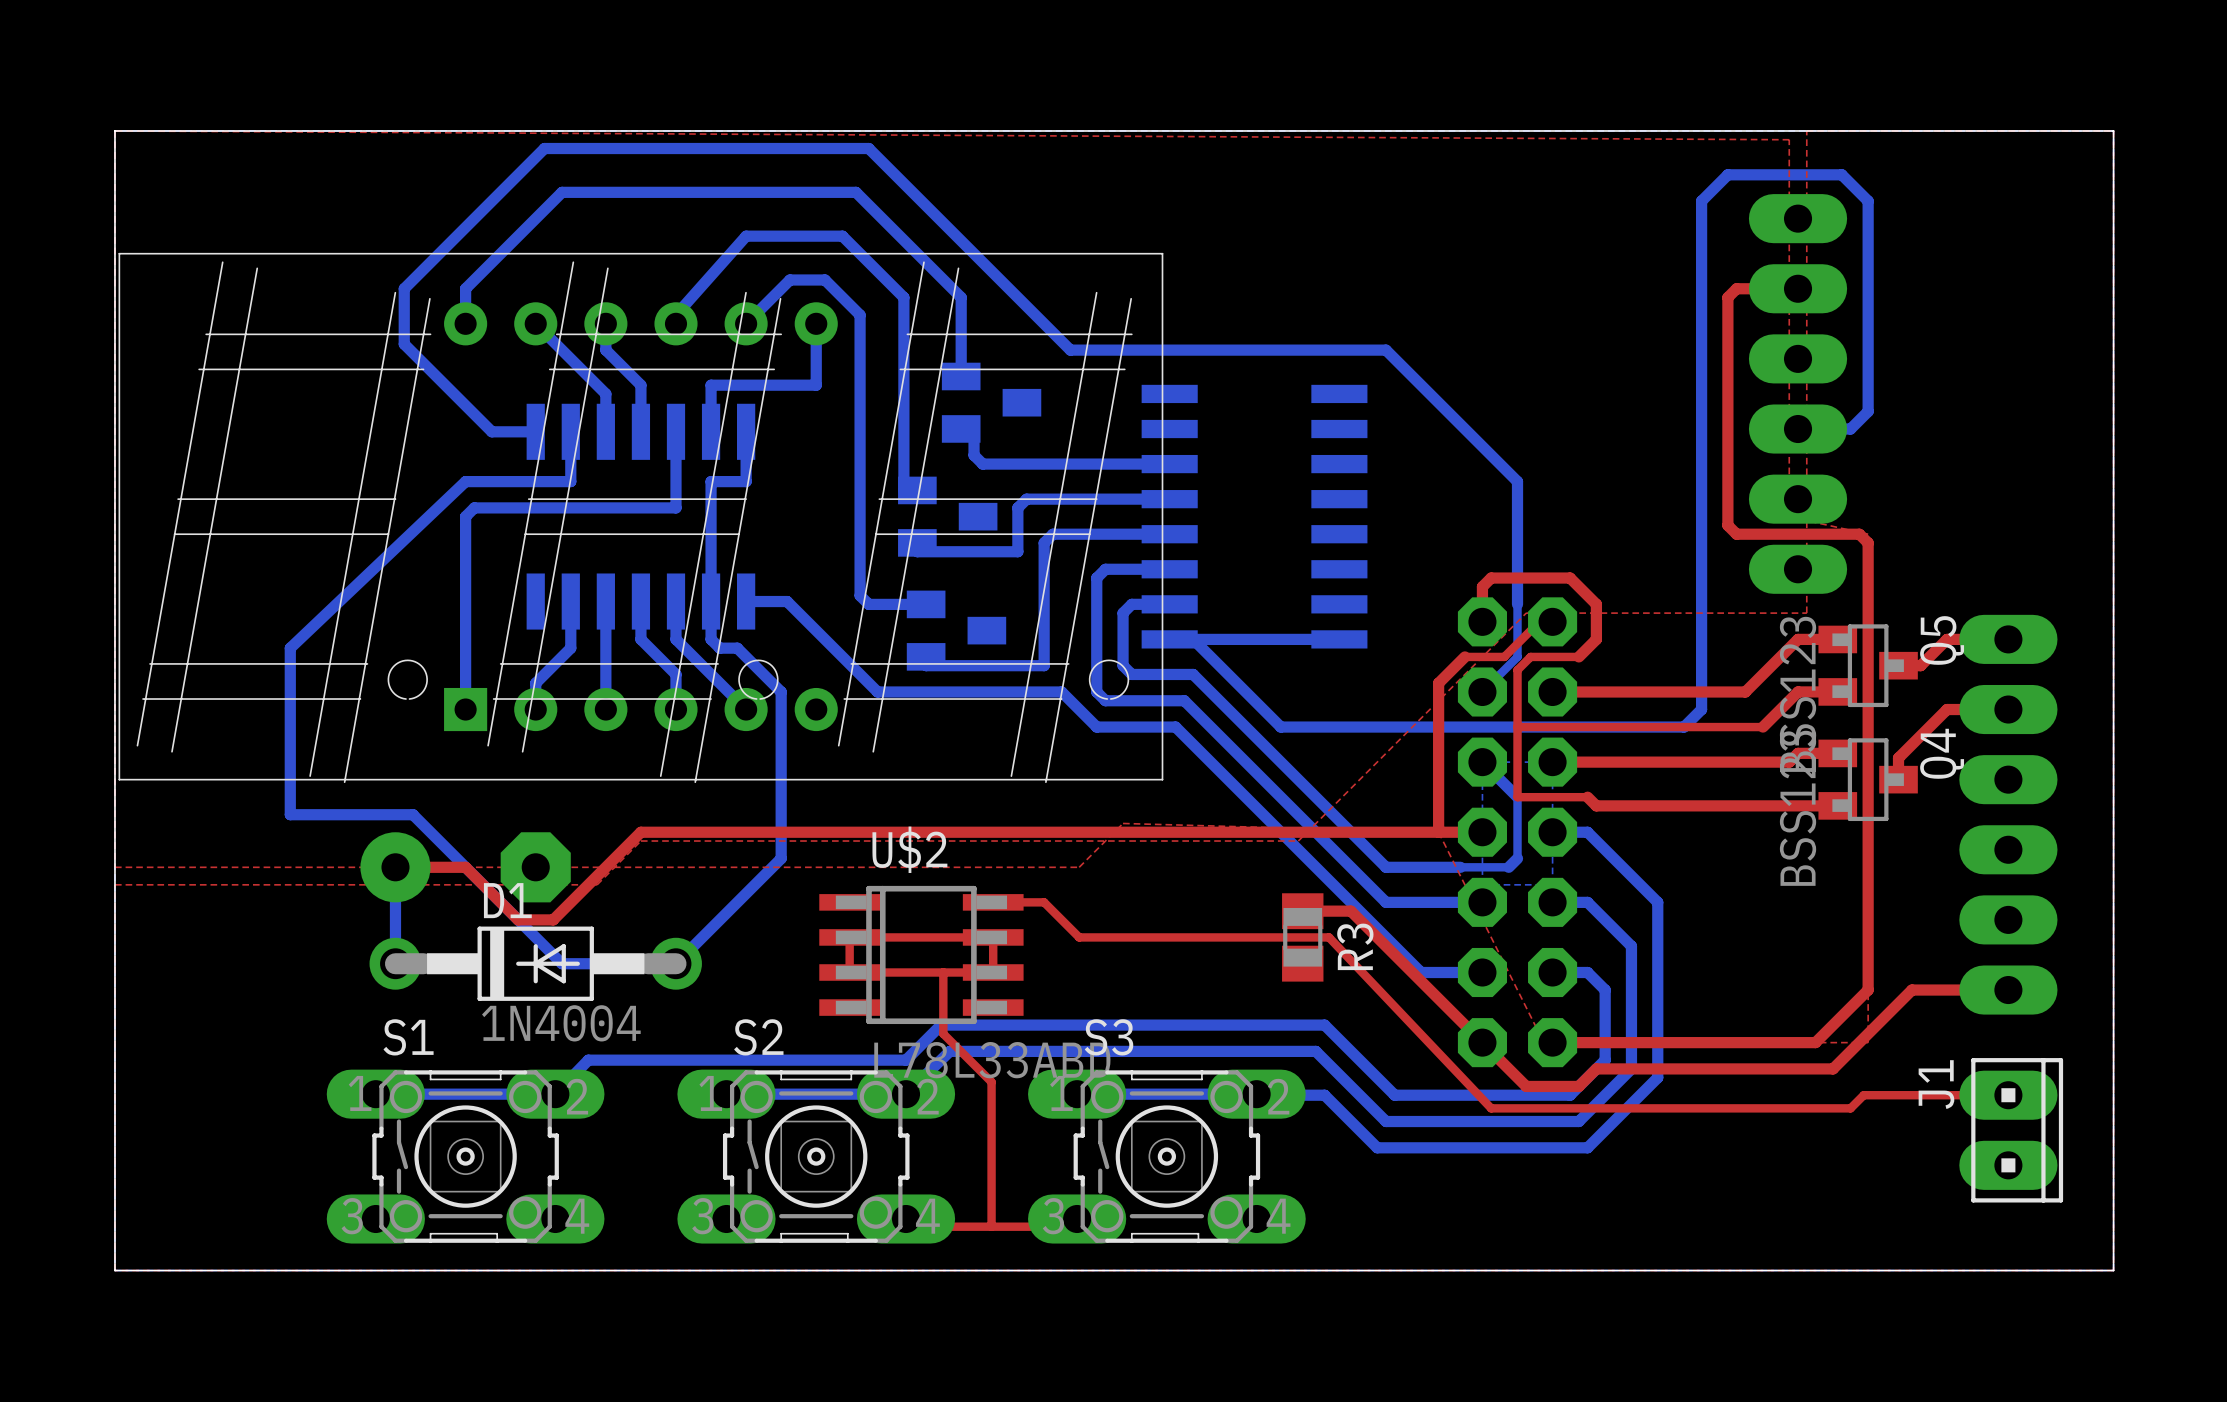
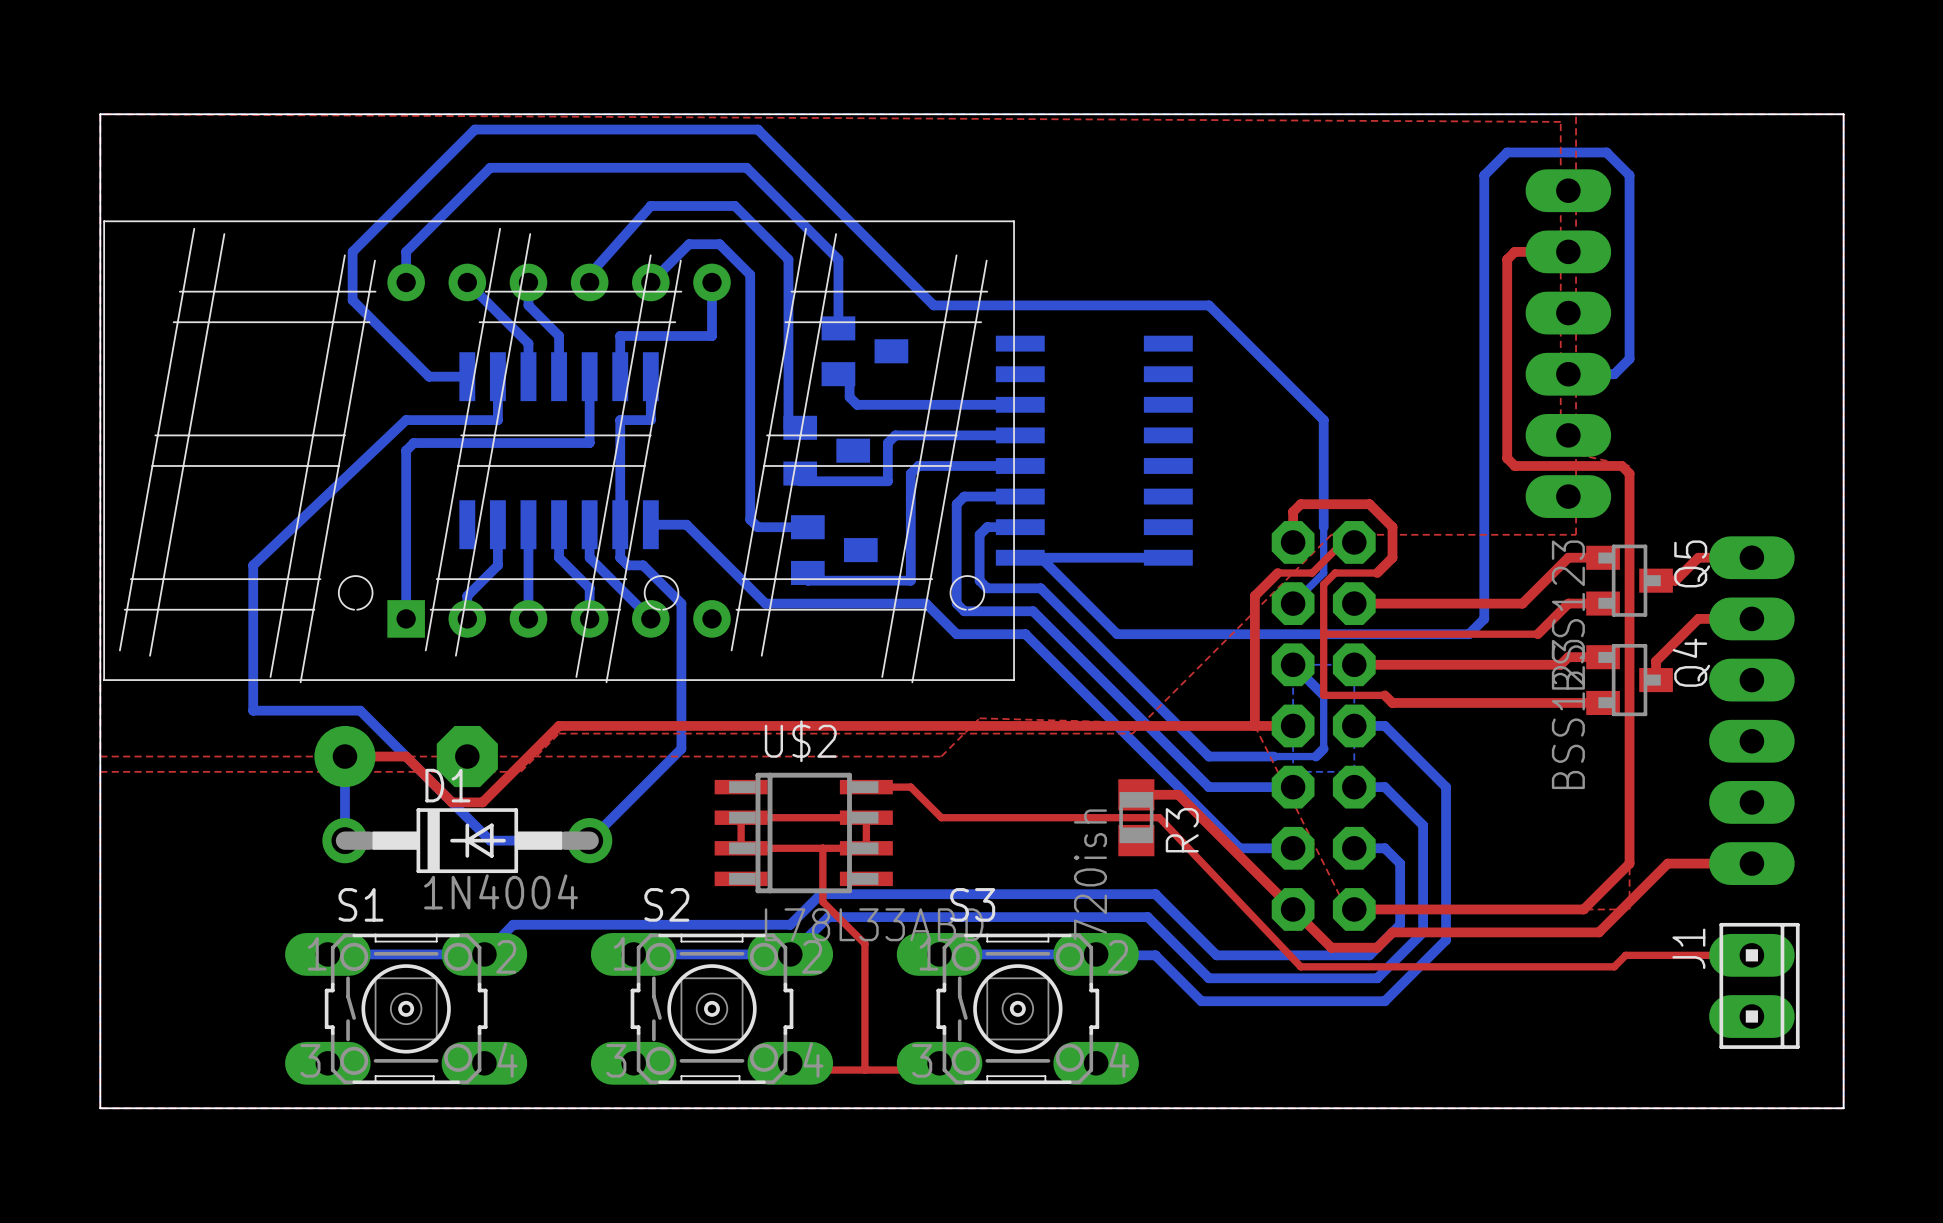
R3 value: none -> 720ish (1090, 874)

